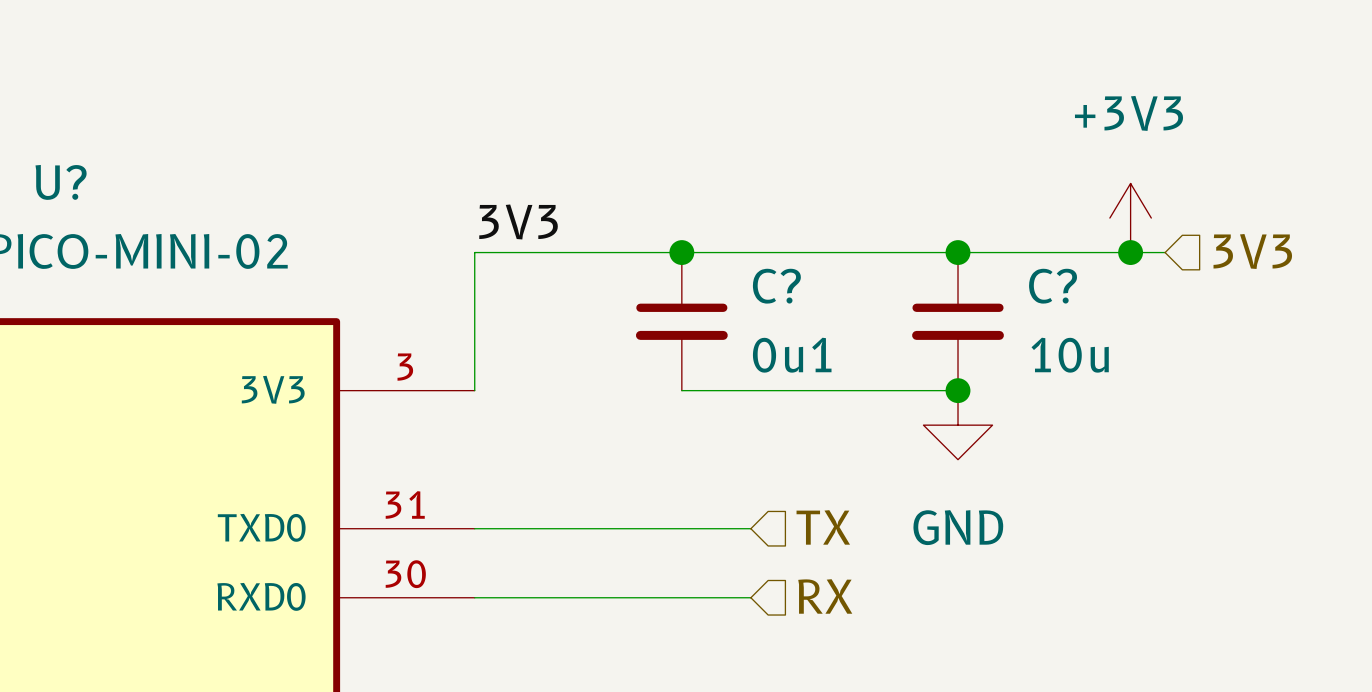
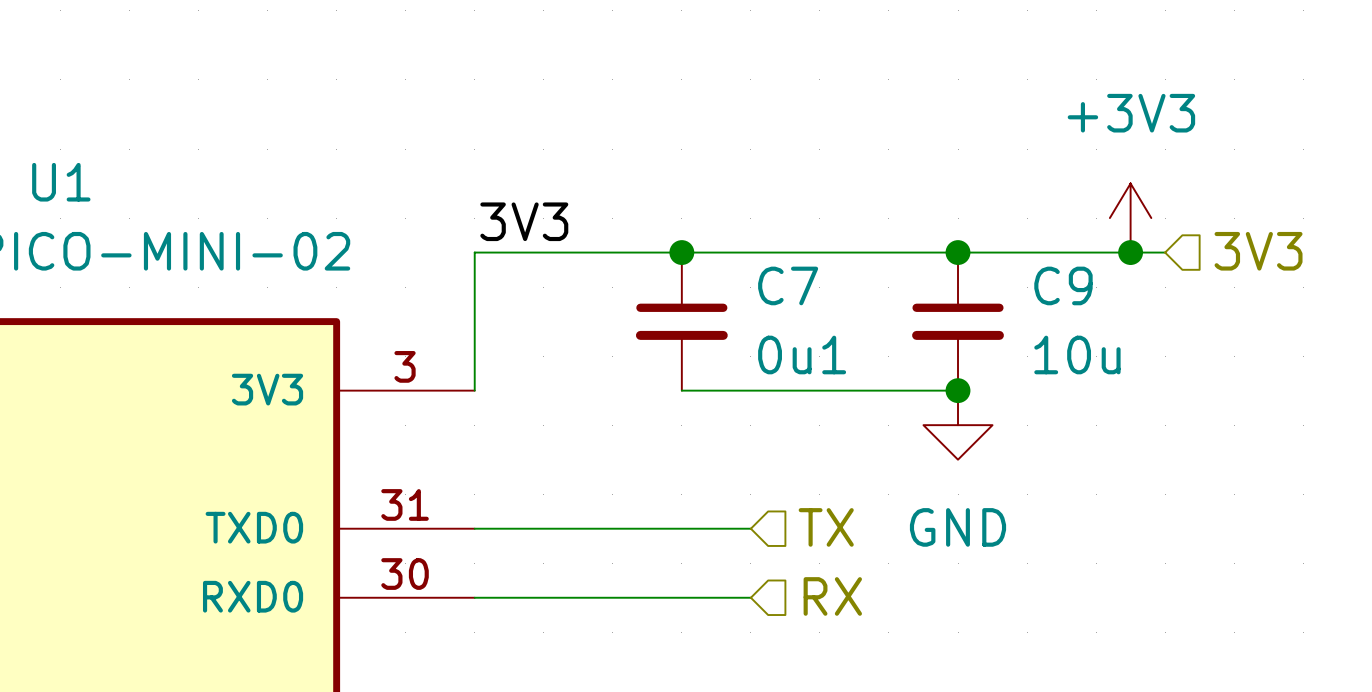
U? name: U? (61, 182) -> U1 (61, 182)
C? name: C? (776, 286) -> C7 (788, 285)
C? name: C? (1053, 286) -> C9 (1063, 285)

